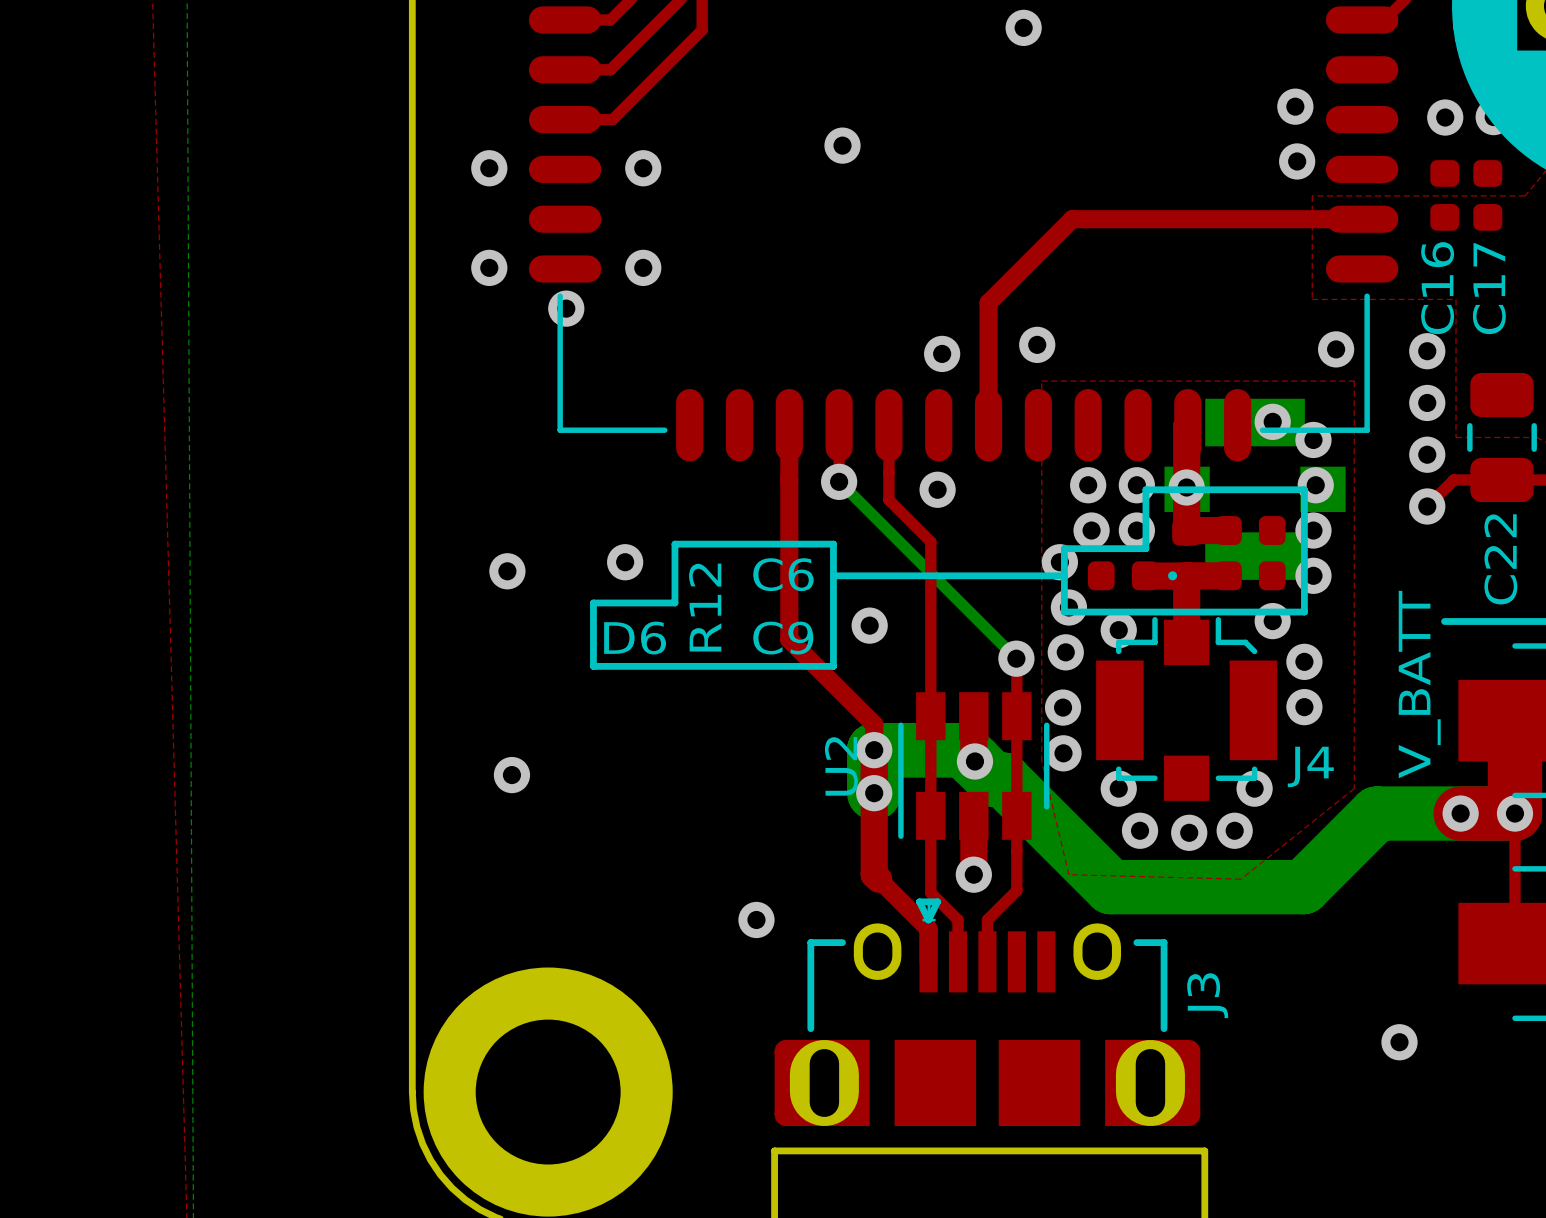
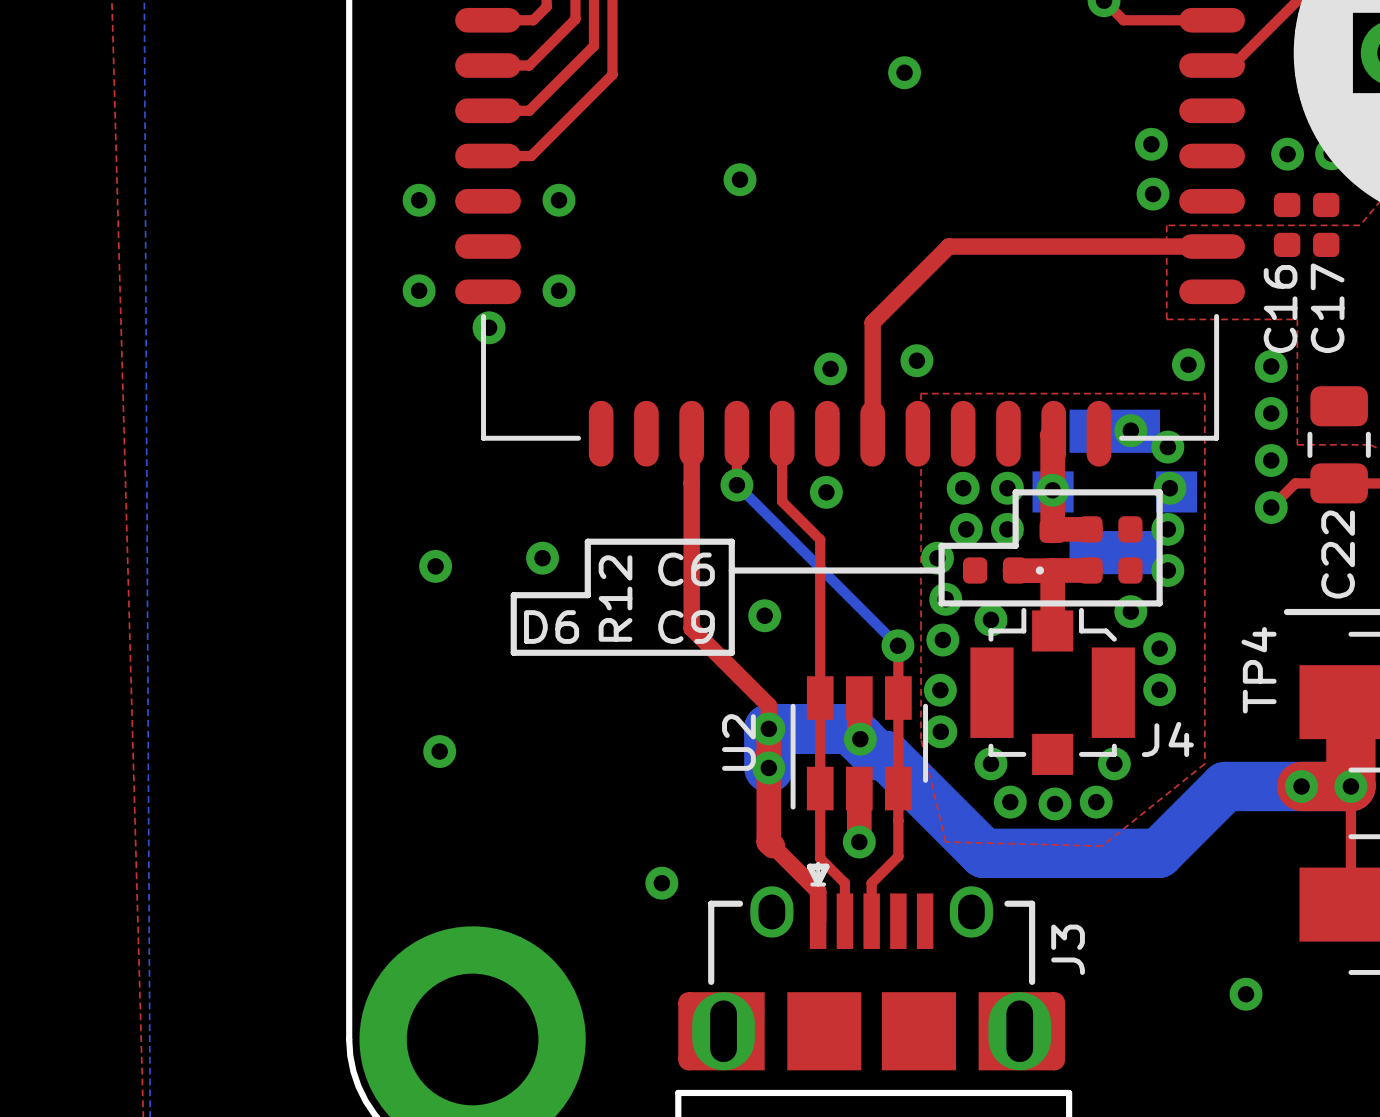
V_BATT name: V_BATT (1419, 684) -> TP4 (1259, 670)

